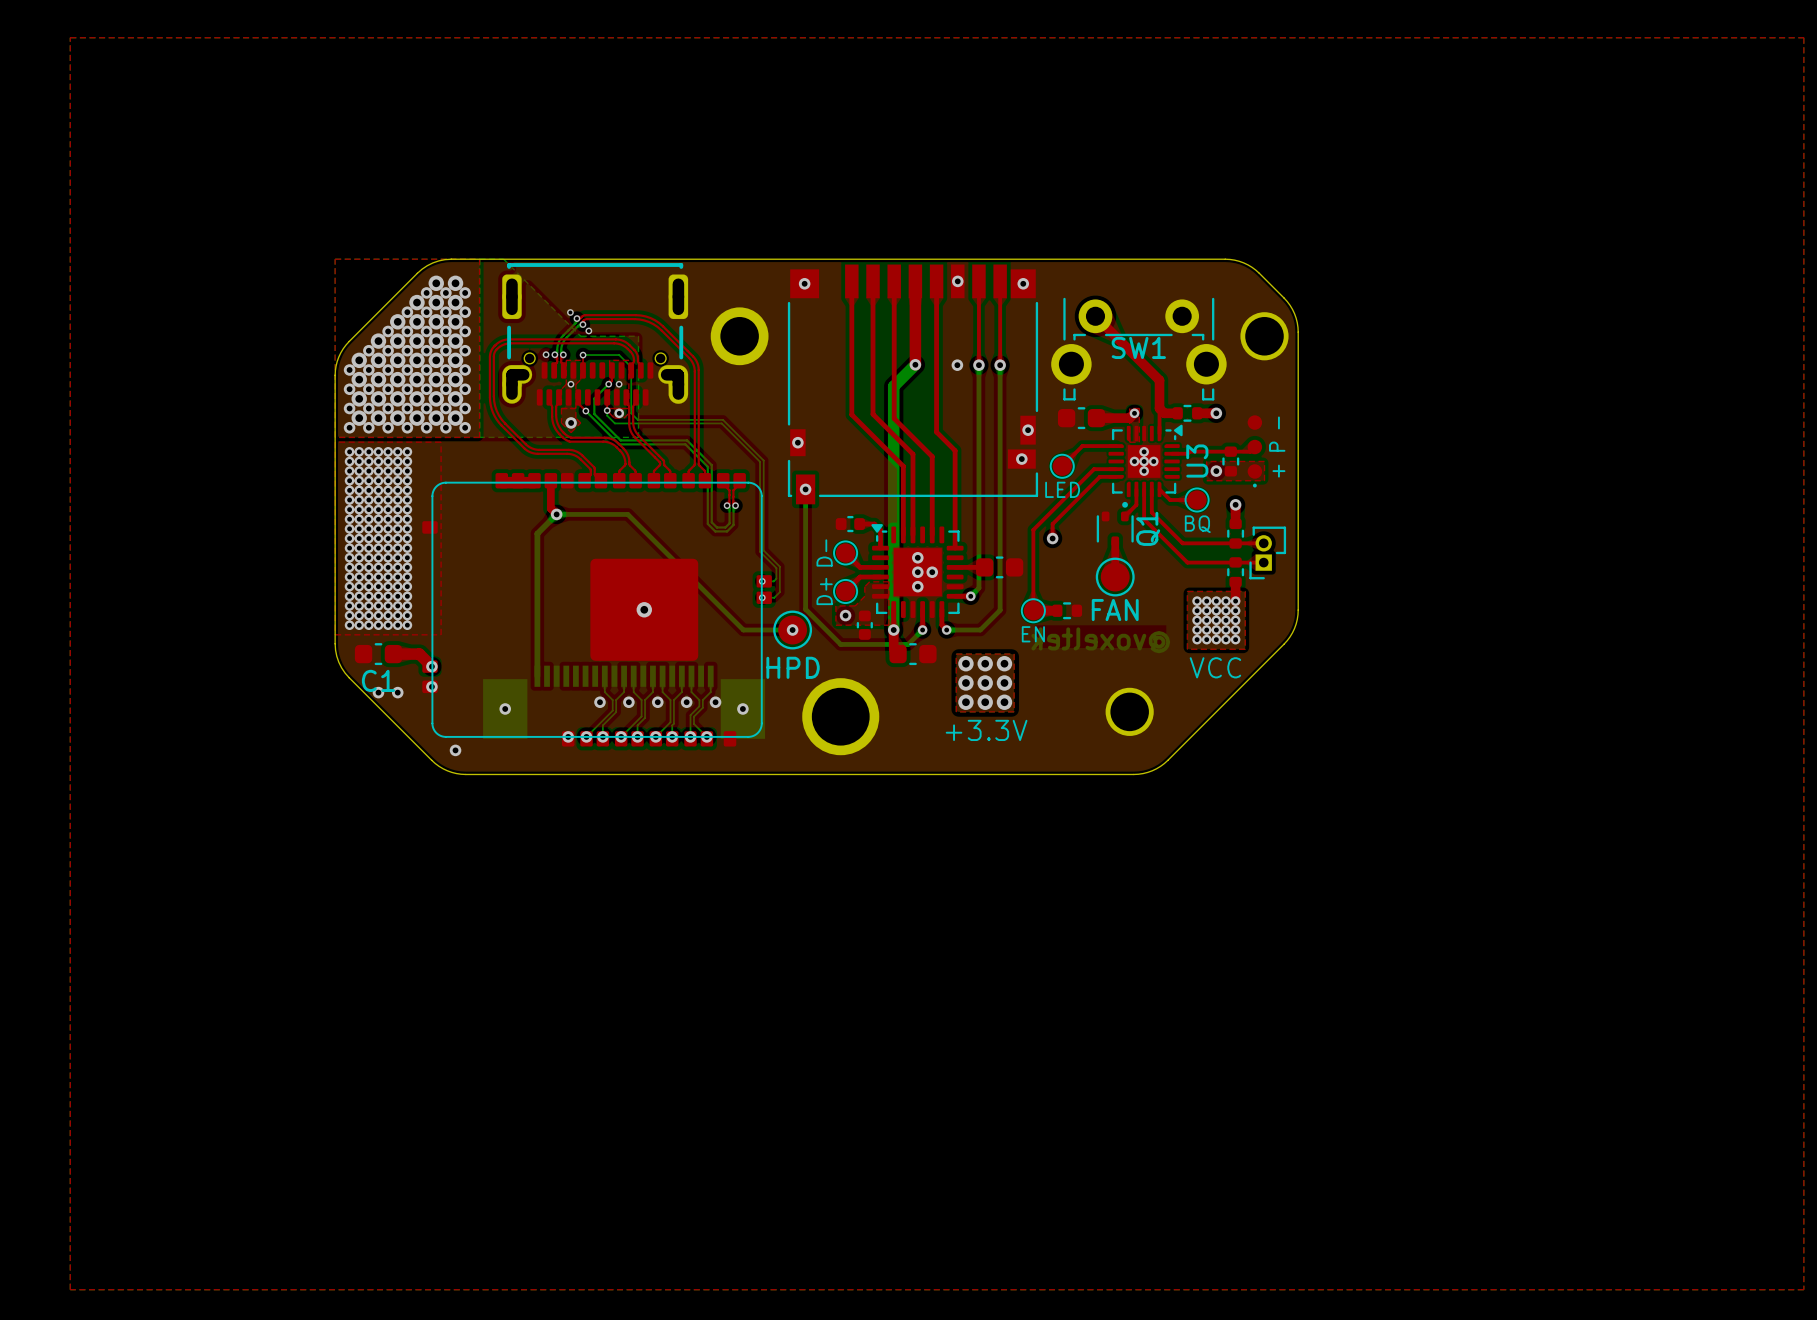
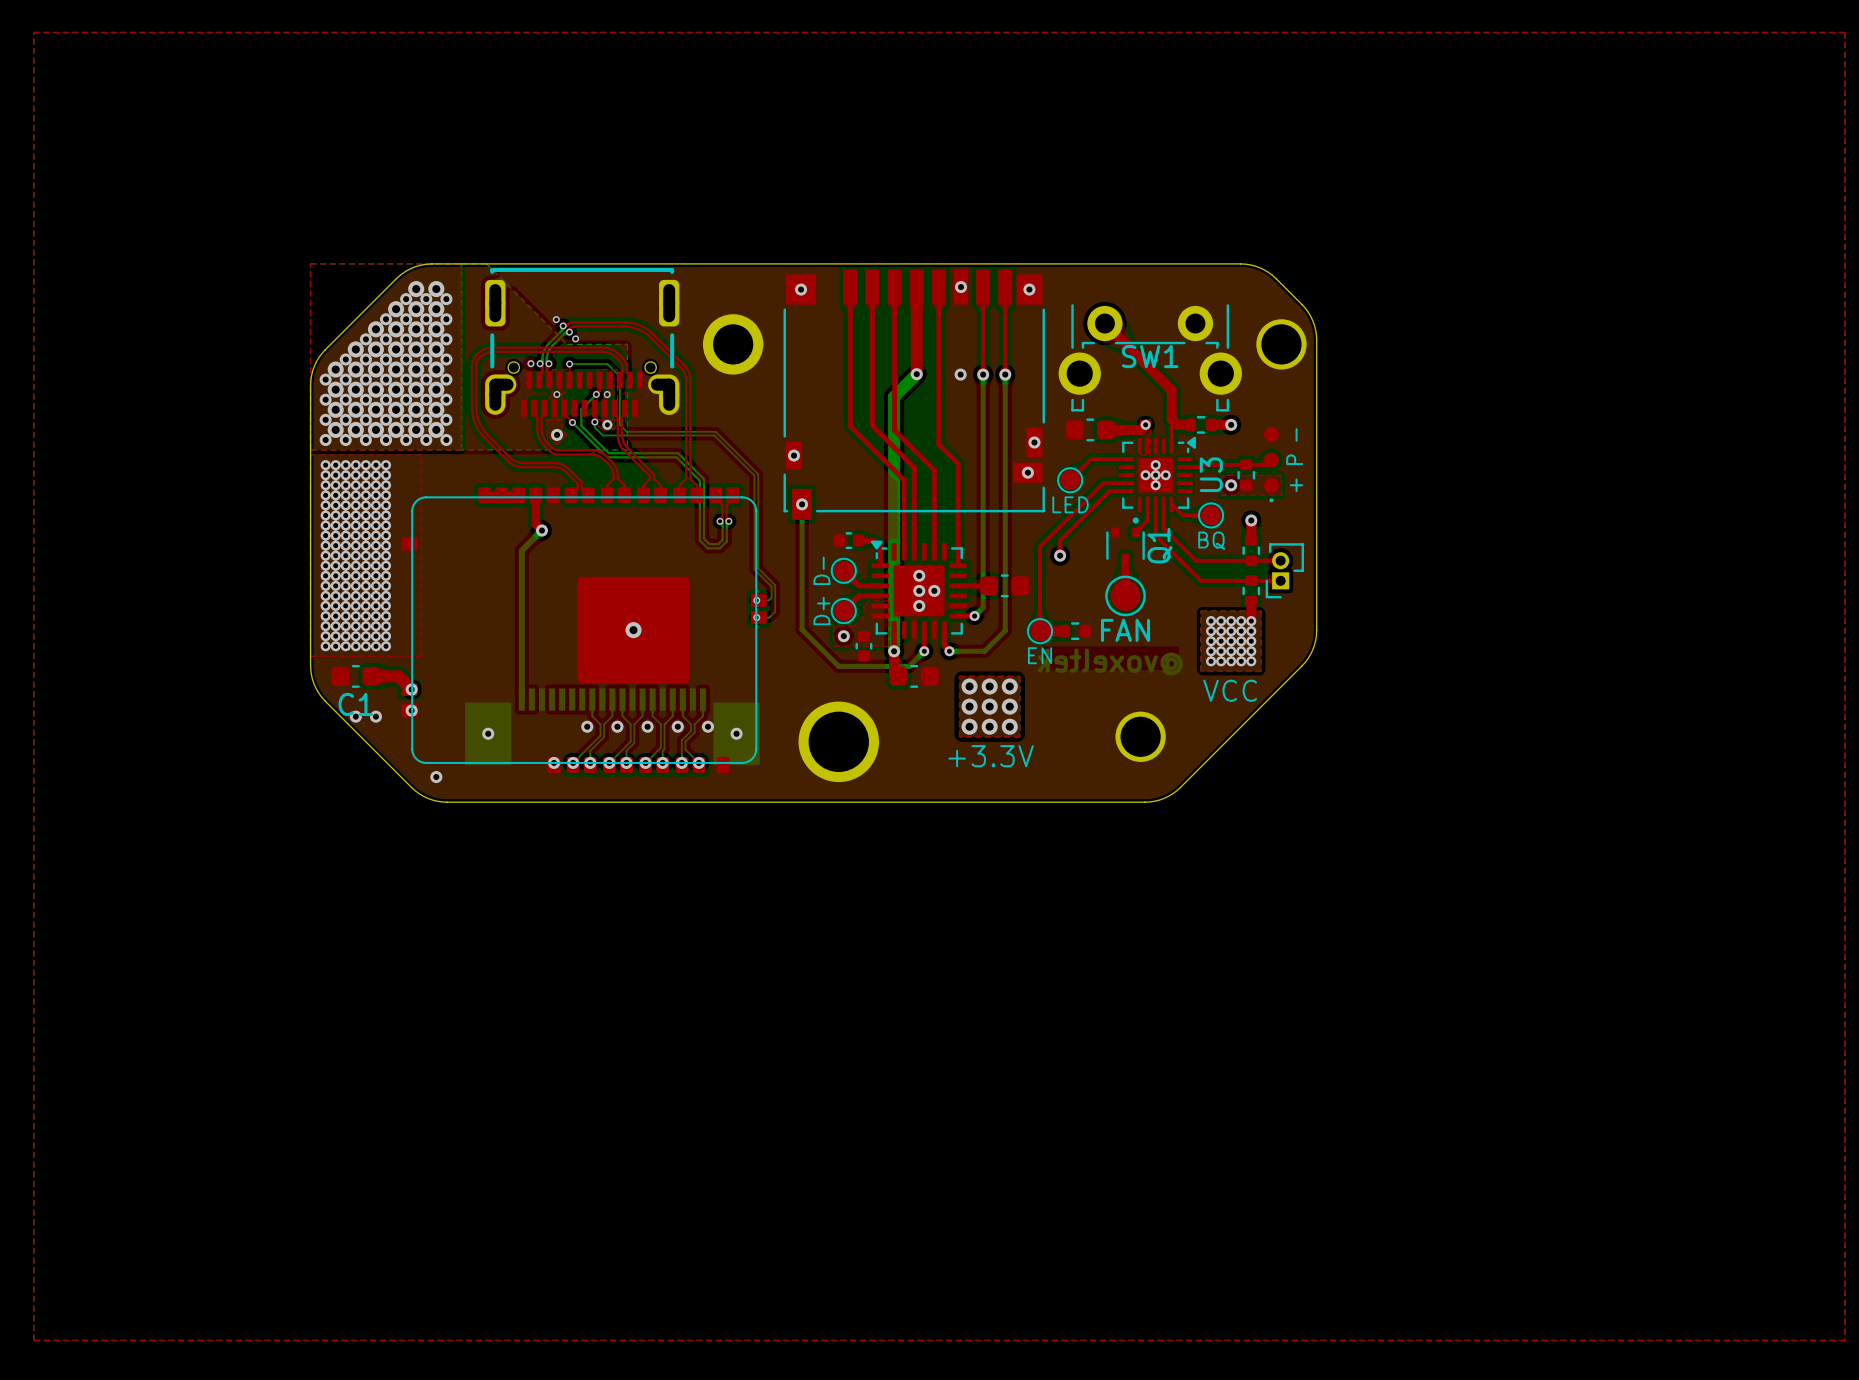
bottom track: (556, 514) (627, 514) (743, 630) (792, 630) -> none
part: HPD (792, 630) -> none
via: (792, 630) -> none

